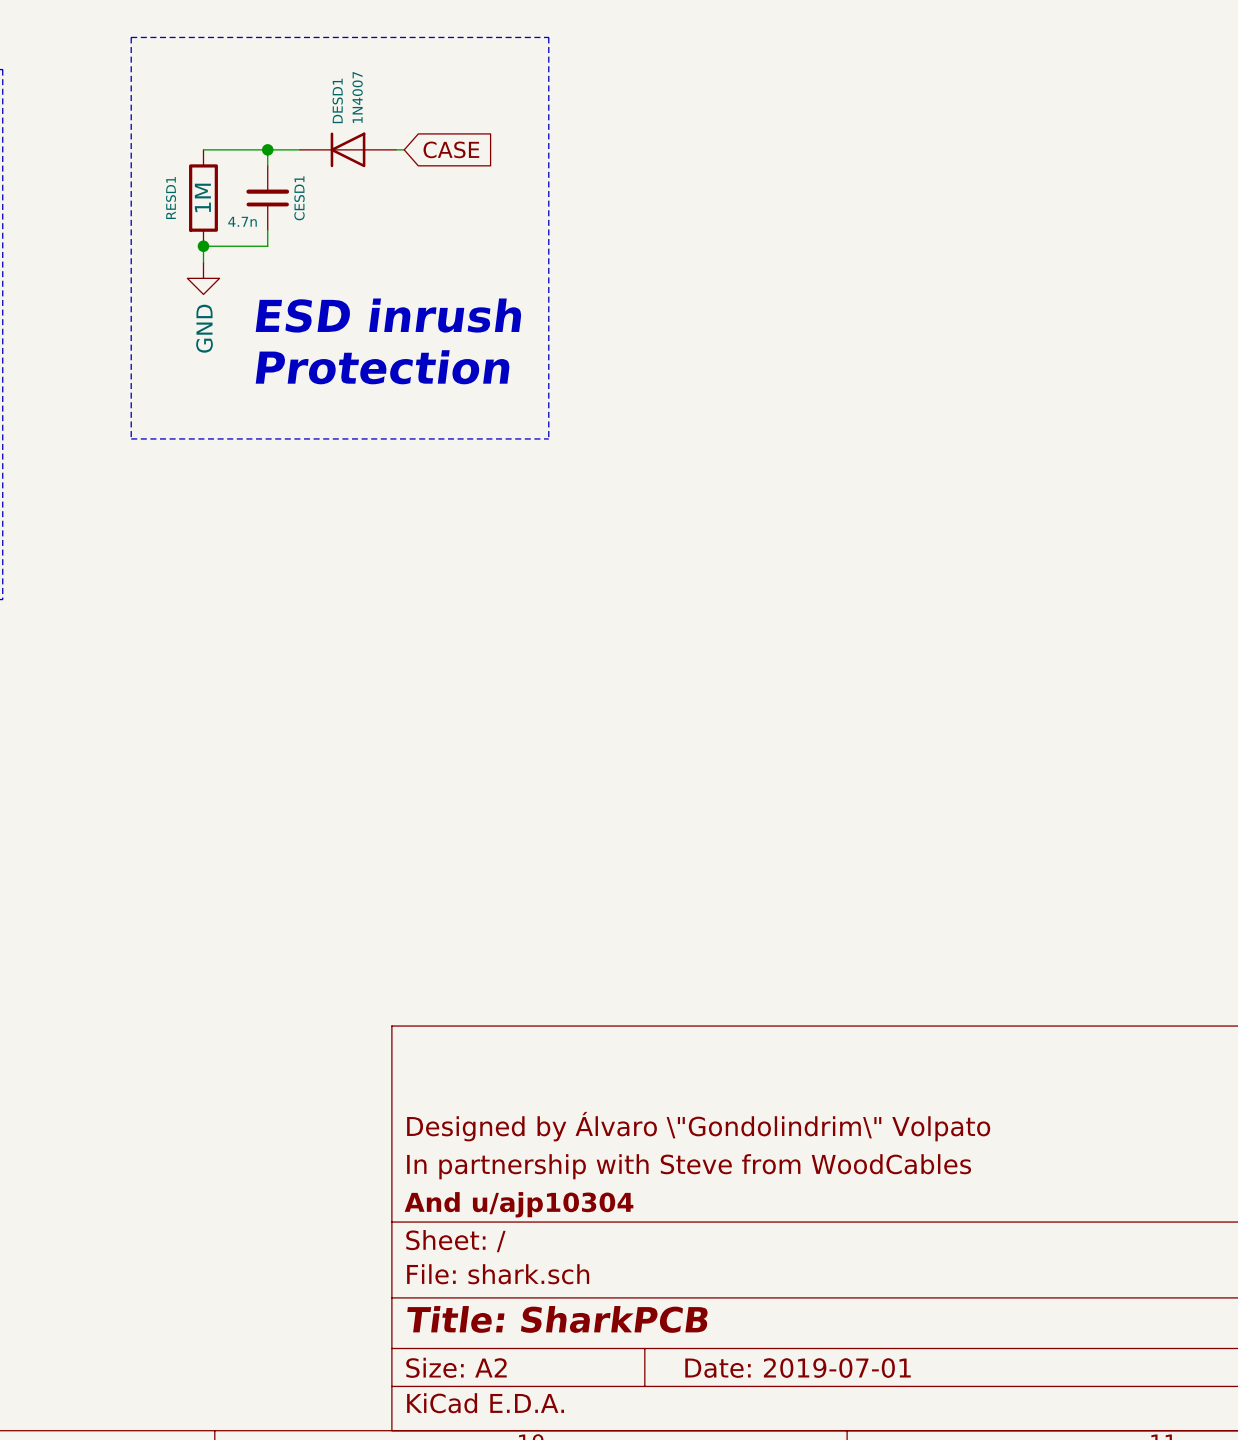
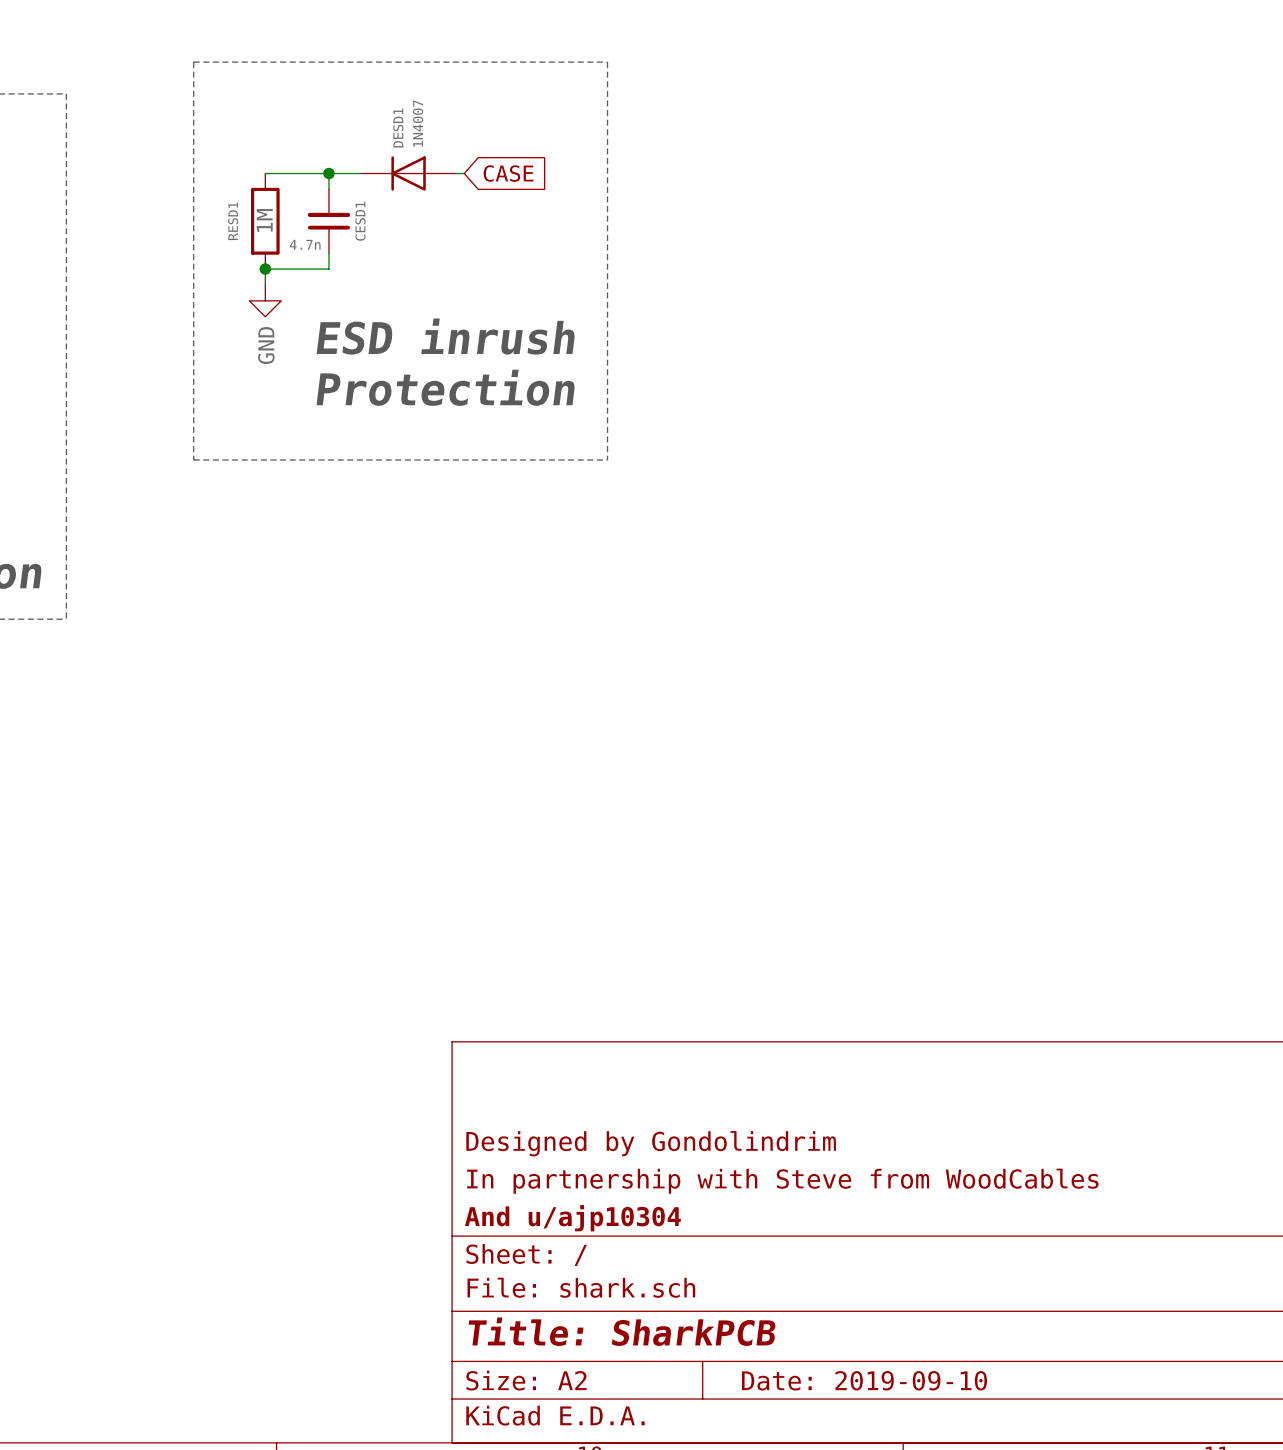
title block: Designed by Álvaro \"Gondolindrim\" Volpato (698, 1126) -> Designed by Gondolindrim (651, 1143)
title block: Date: 2019-07-01 (798, 1368) -> Date: 2019-09-10 (864, 1380)

